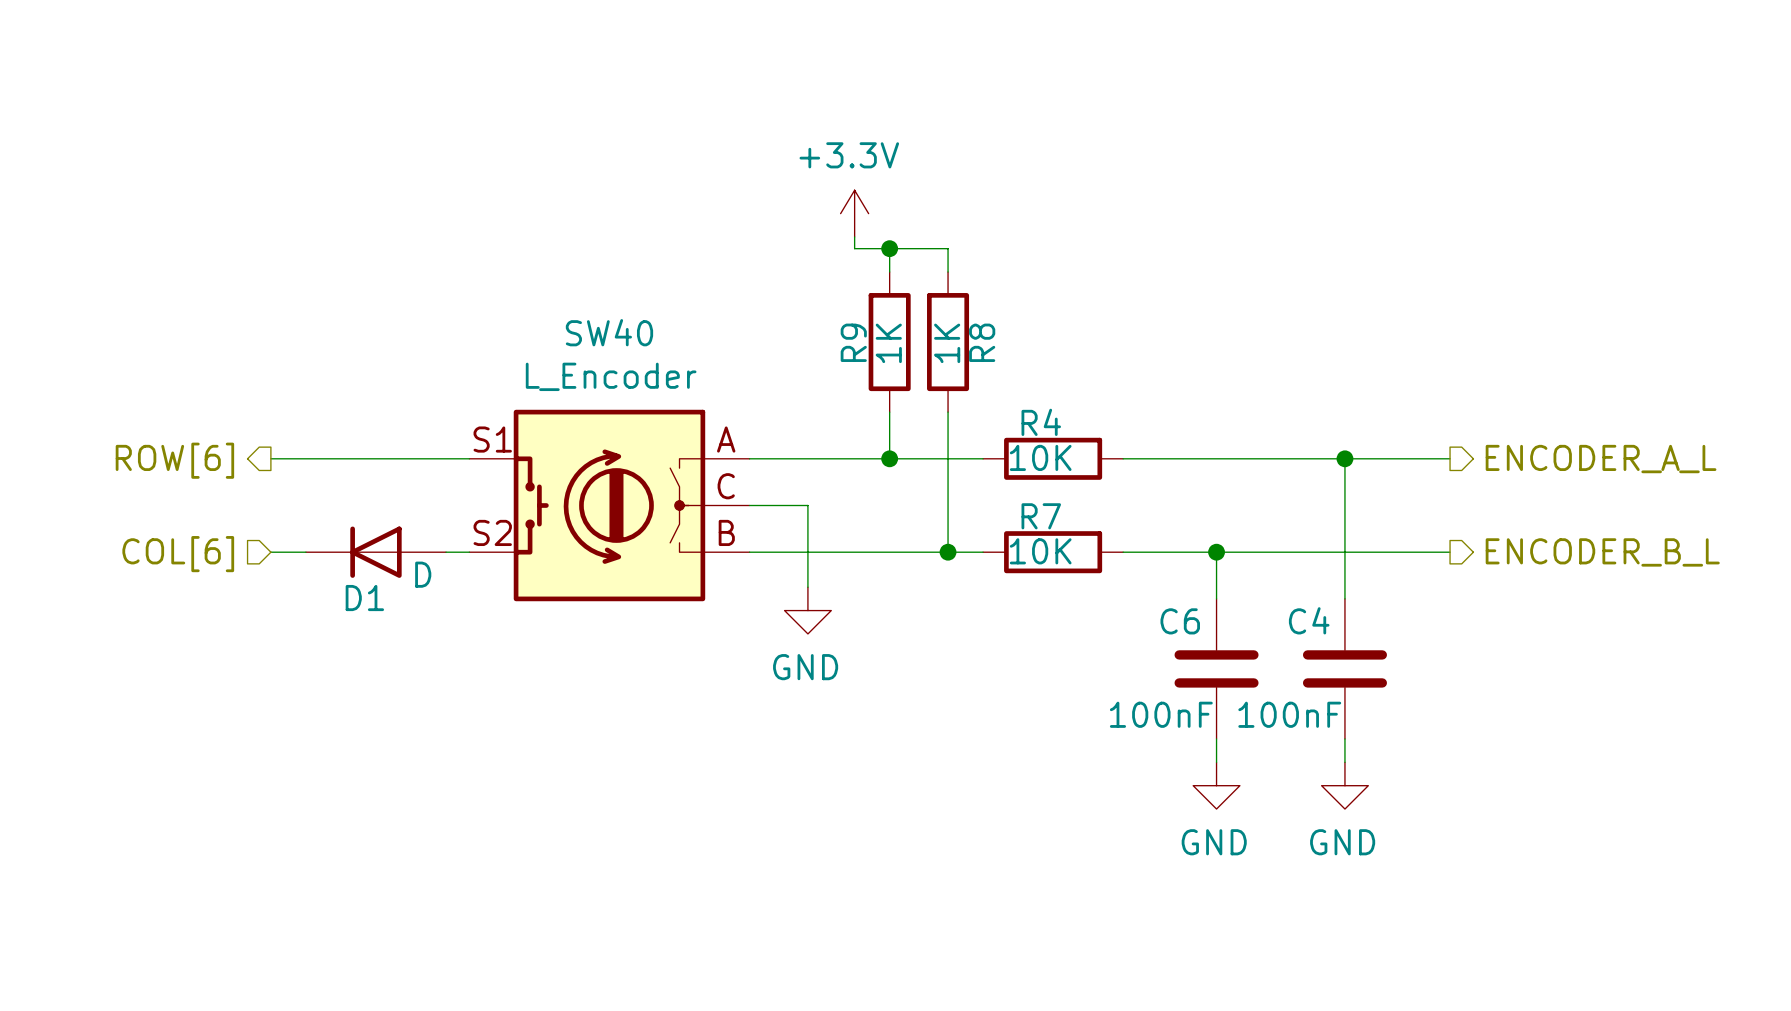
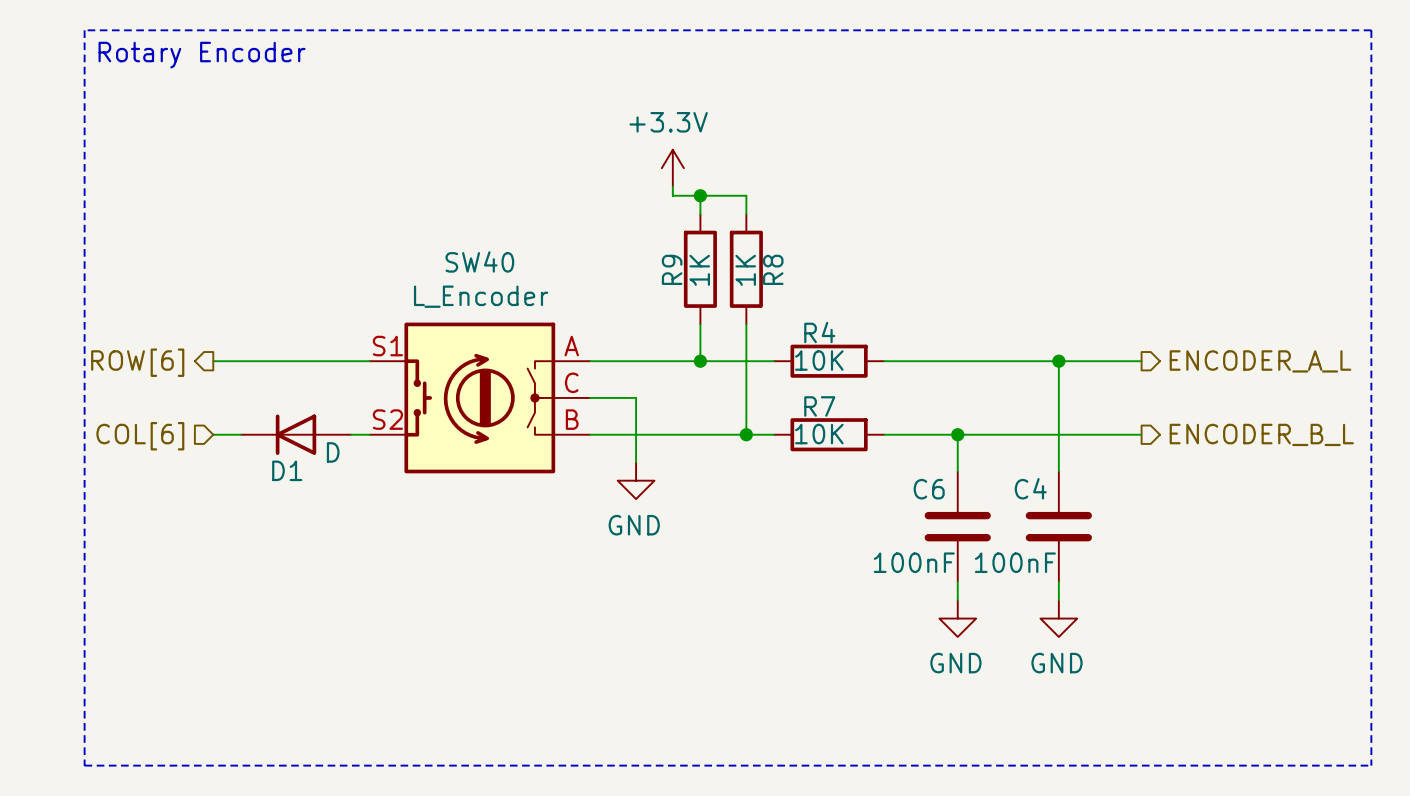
line: none -> (84, 30) (1371, 30) (1371, 765) (84, 765) (84, 30)
text: none -> Rotary Encoder (202, 55)

